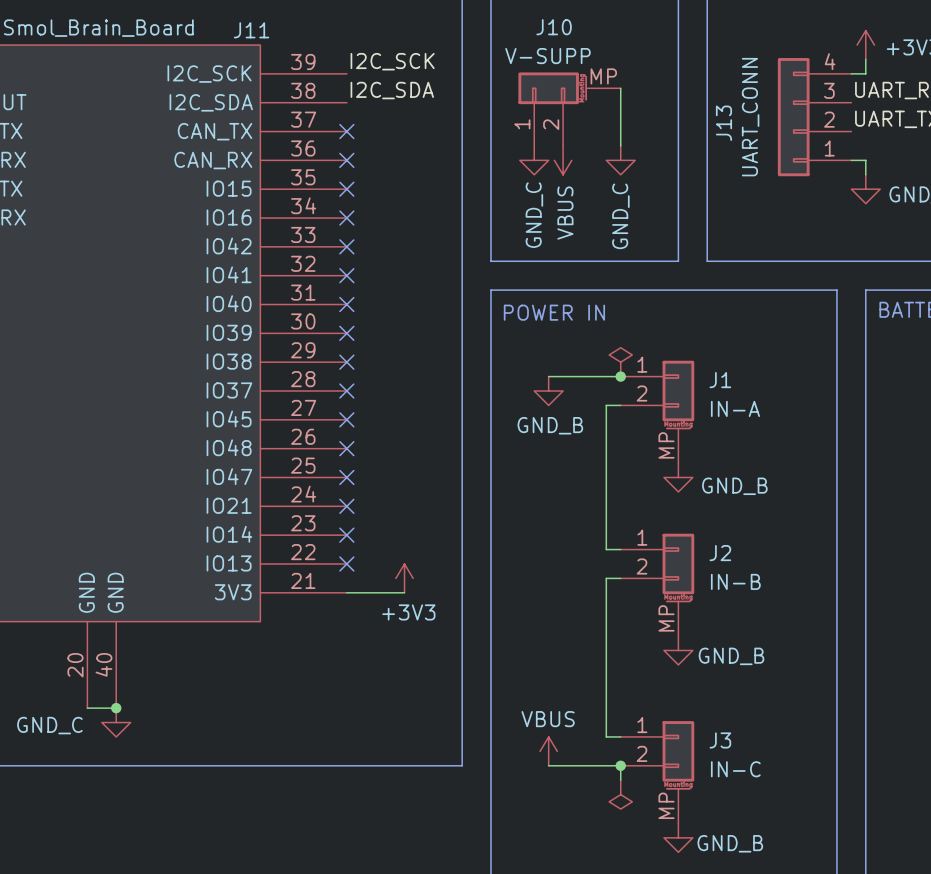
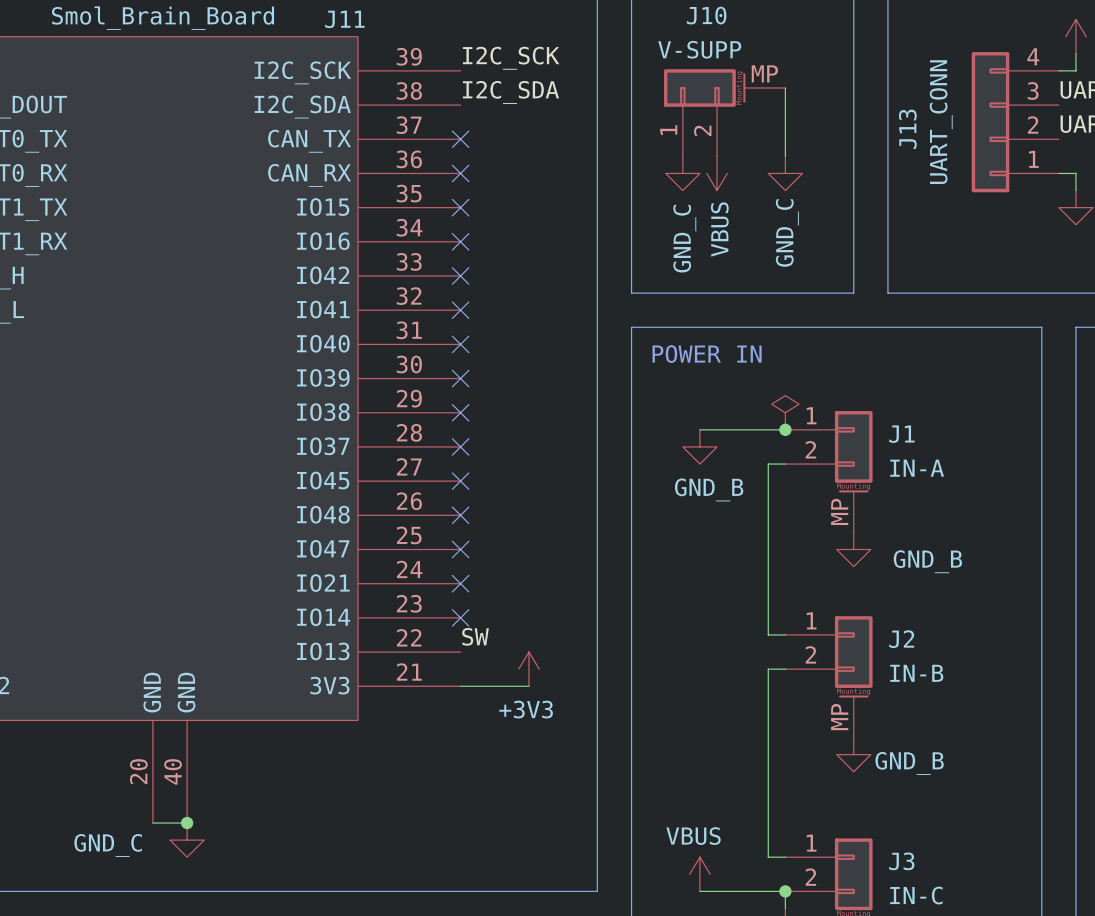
label: none -> SW (475, 636)
no-connect mark: (346, 563) -> none

